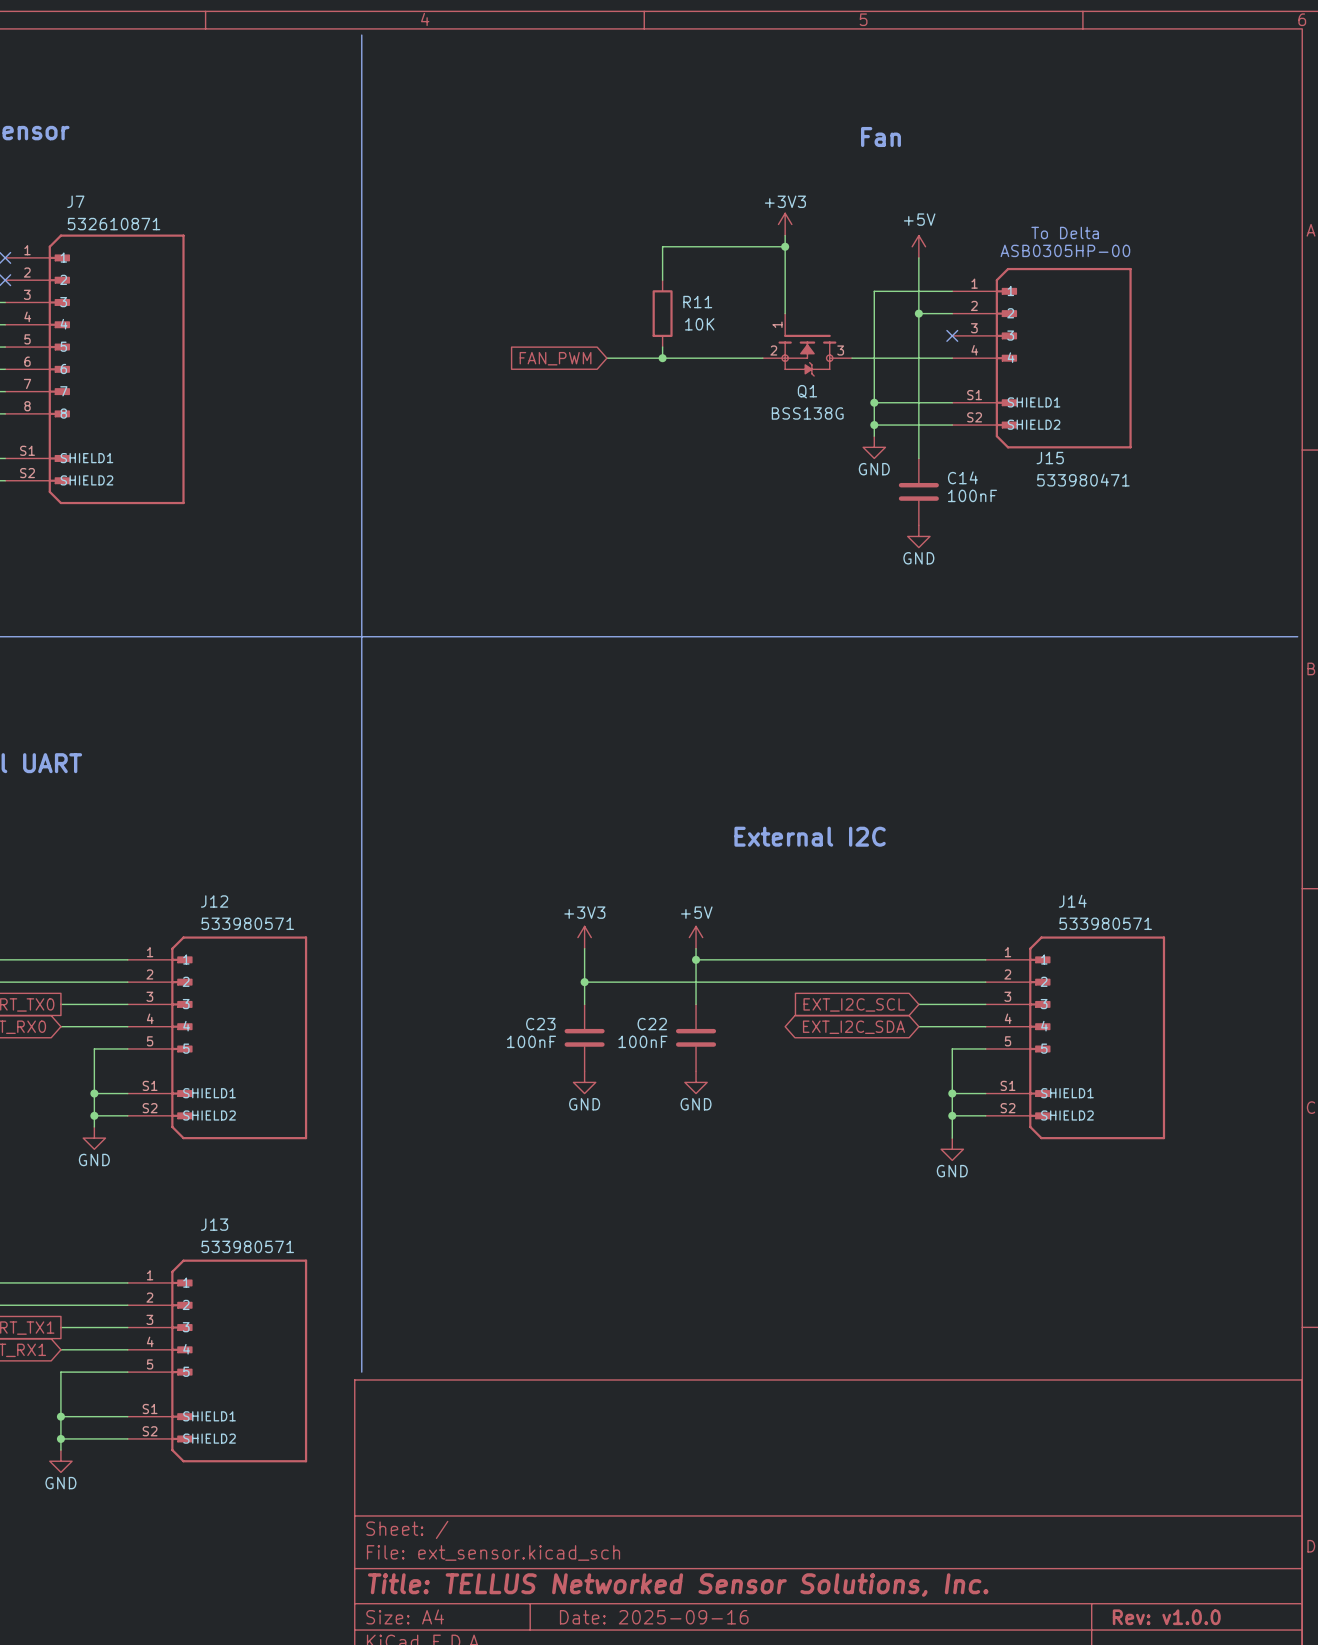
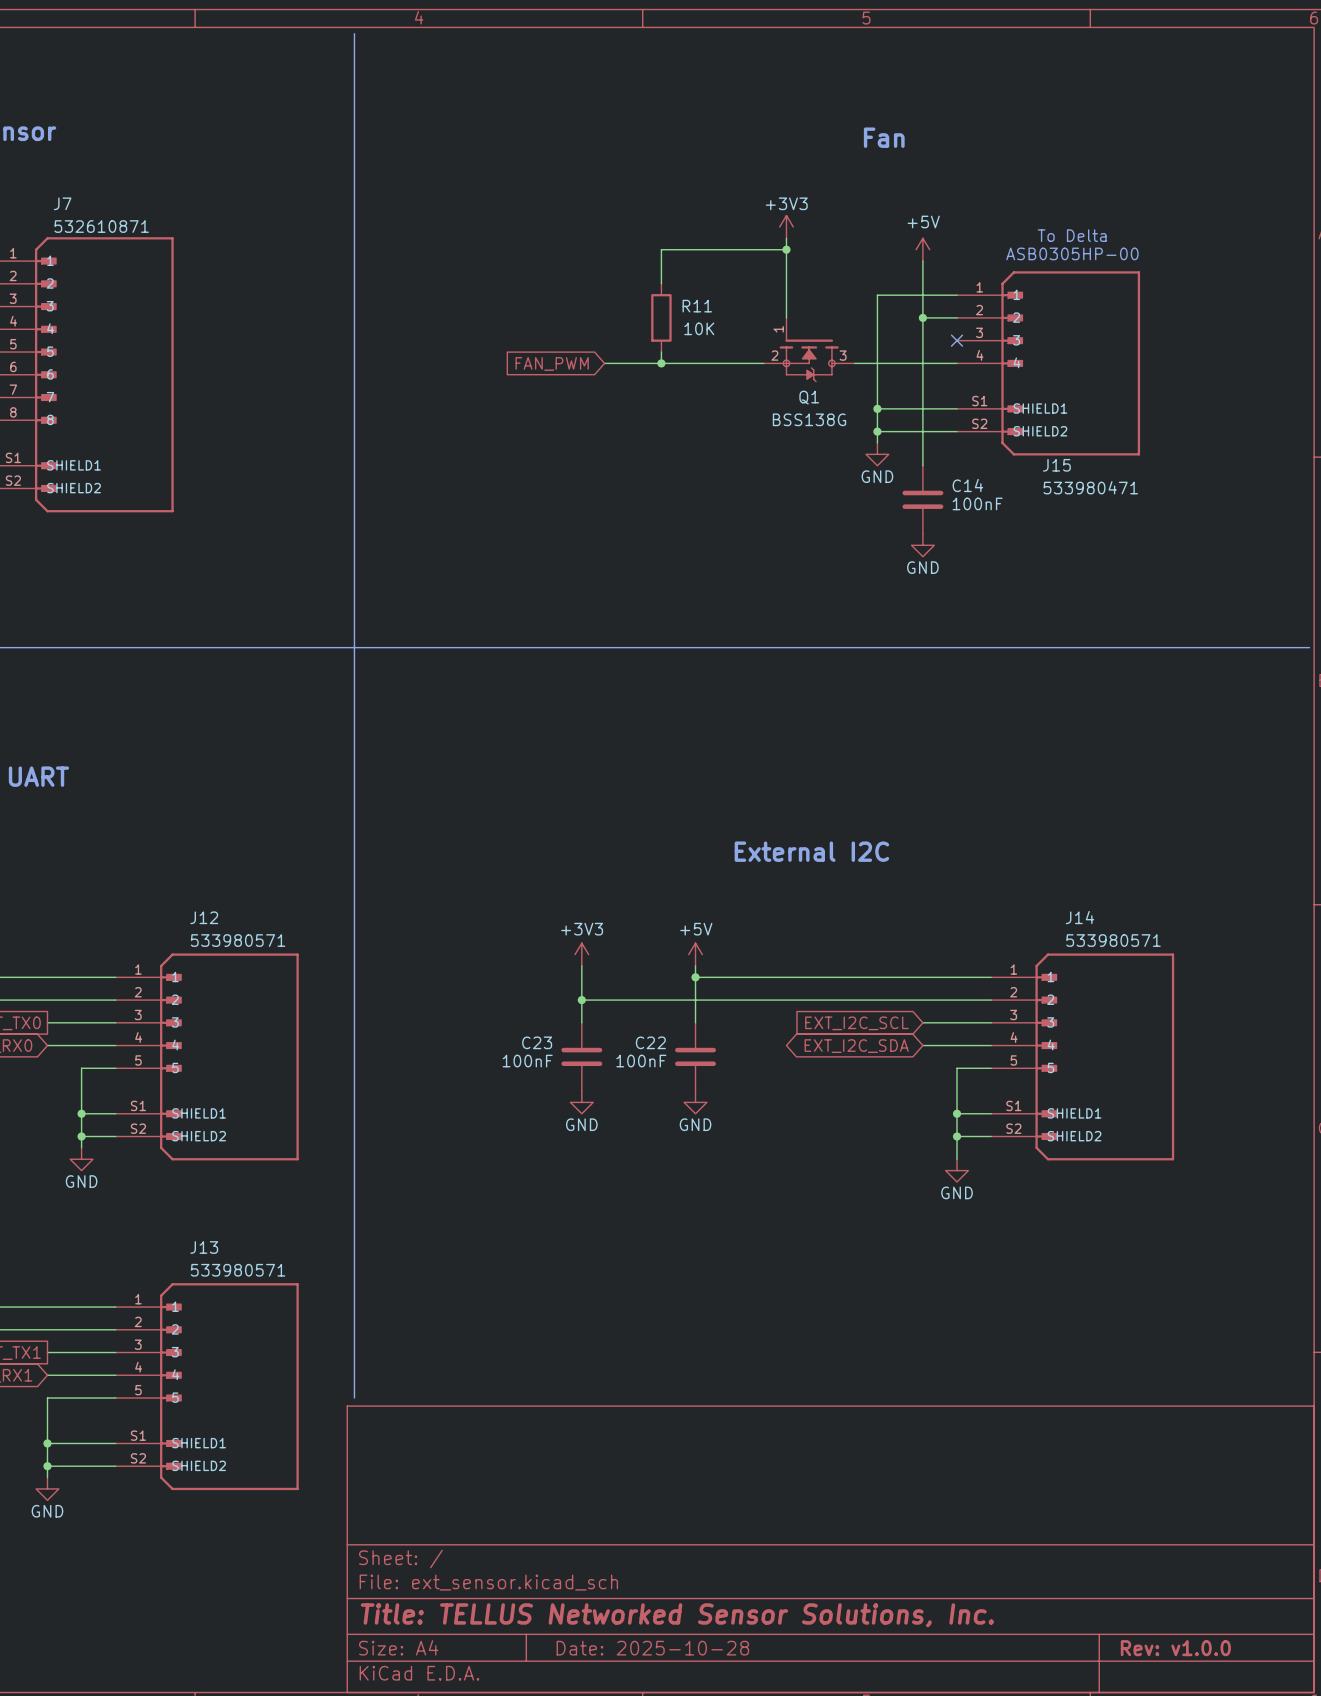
title block: Date: 2025-09-16 (654, 1617) -> Date: 2025-10-28 (652, 1648)

